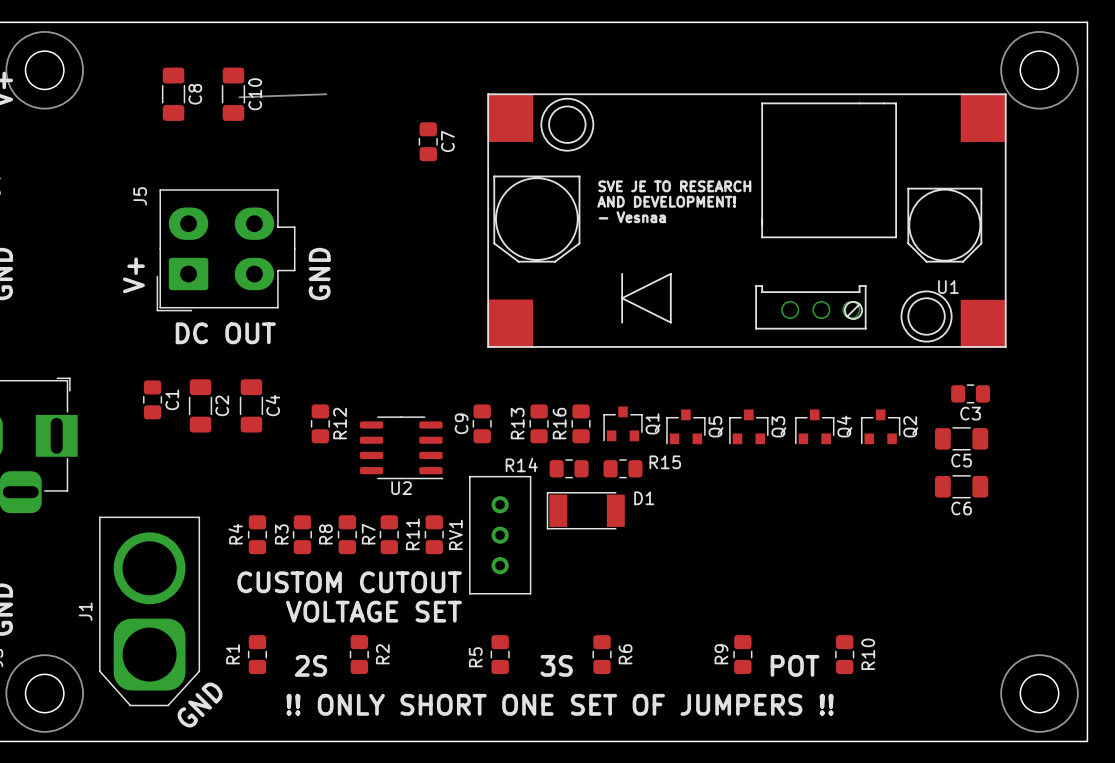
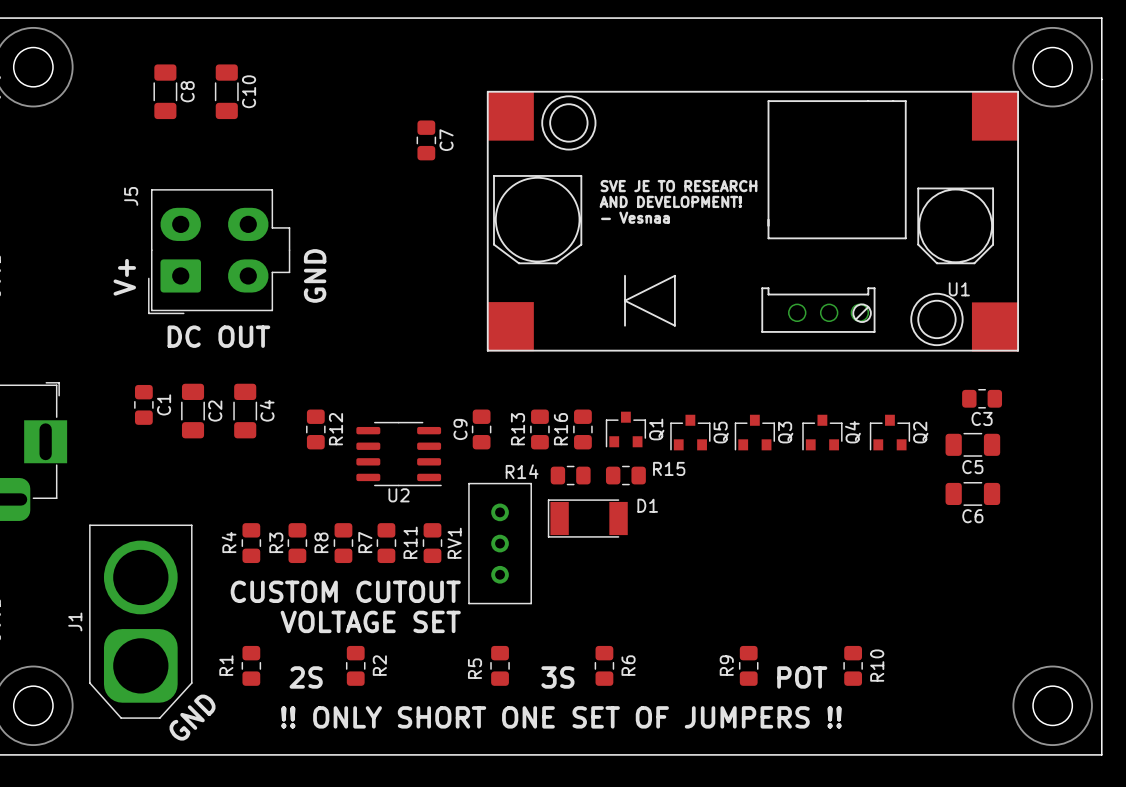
line: (326, 94) (239, 97) -> none

